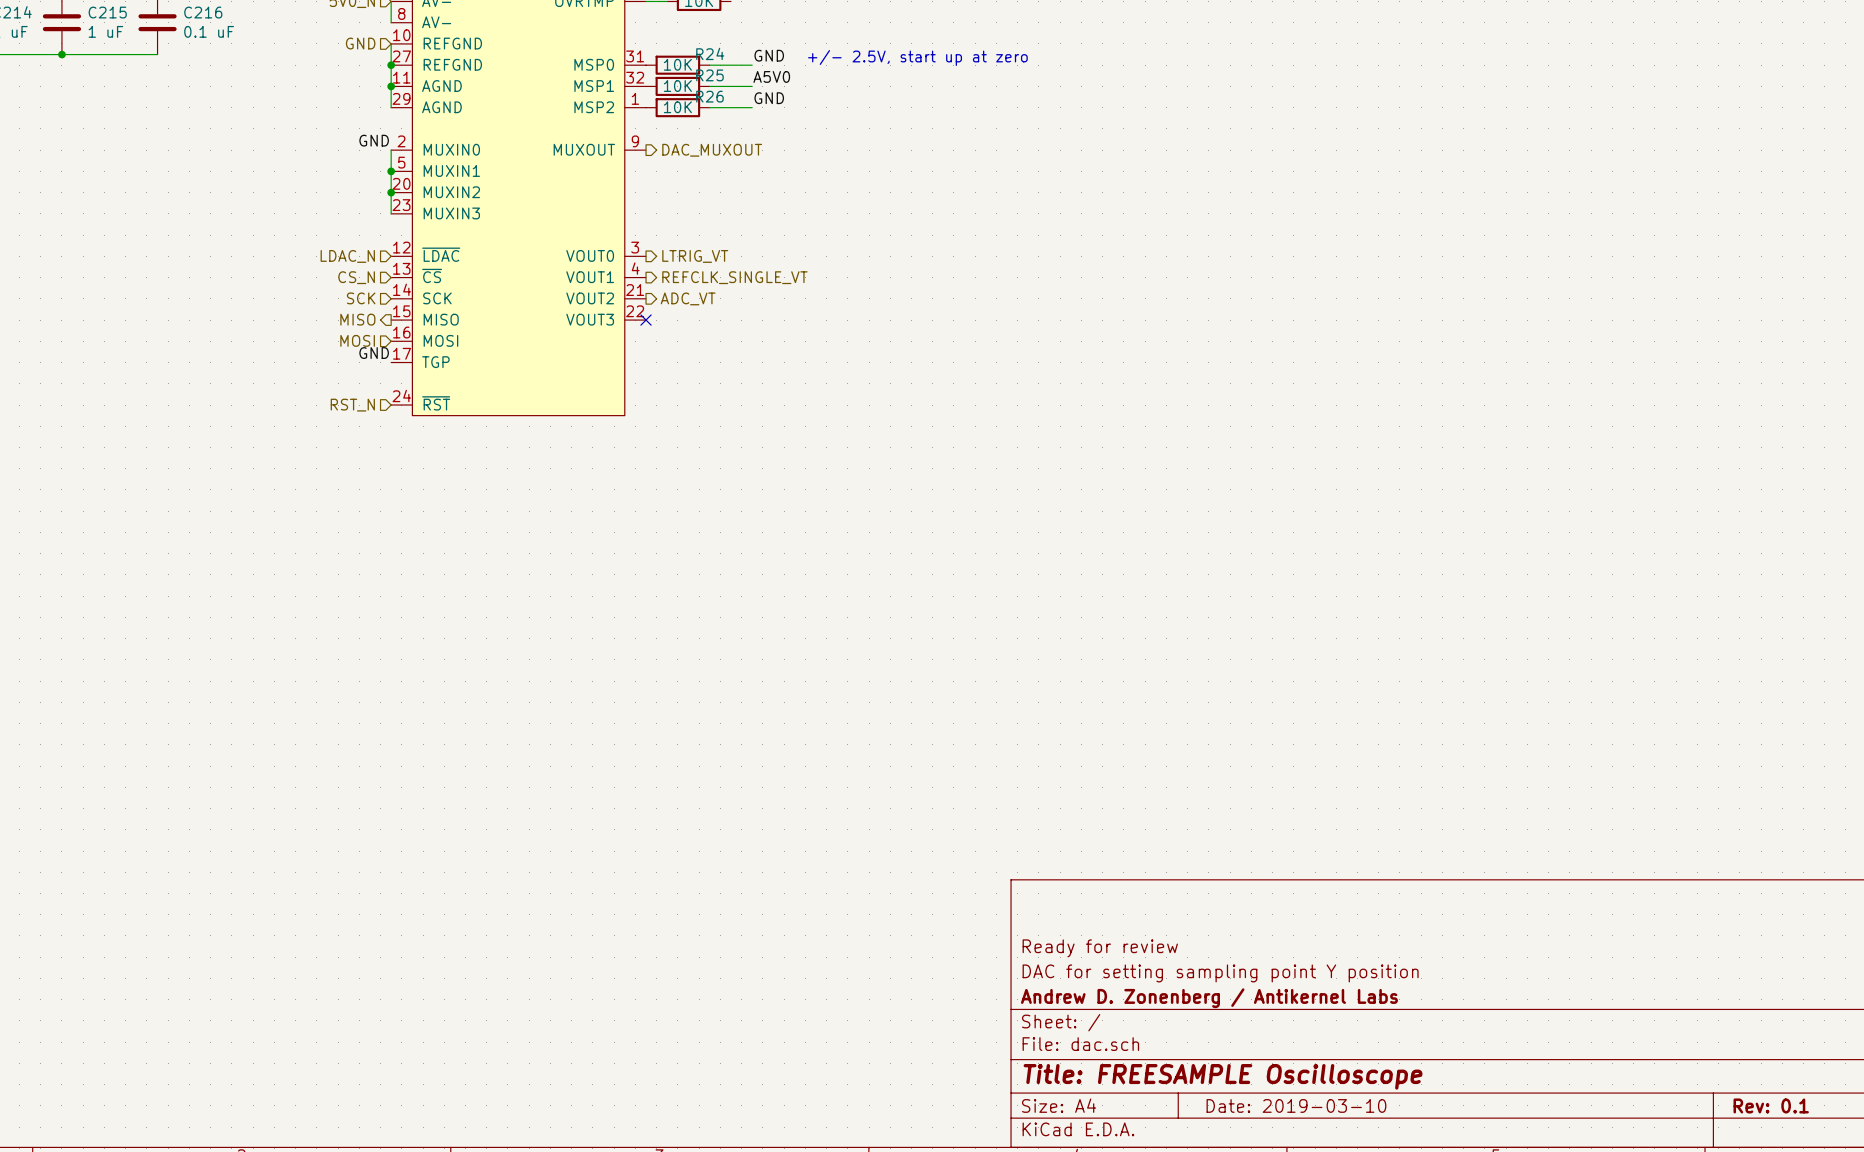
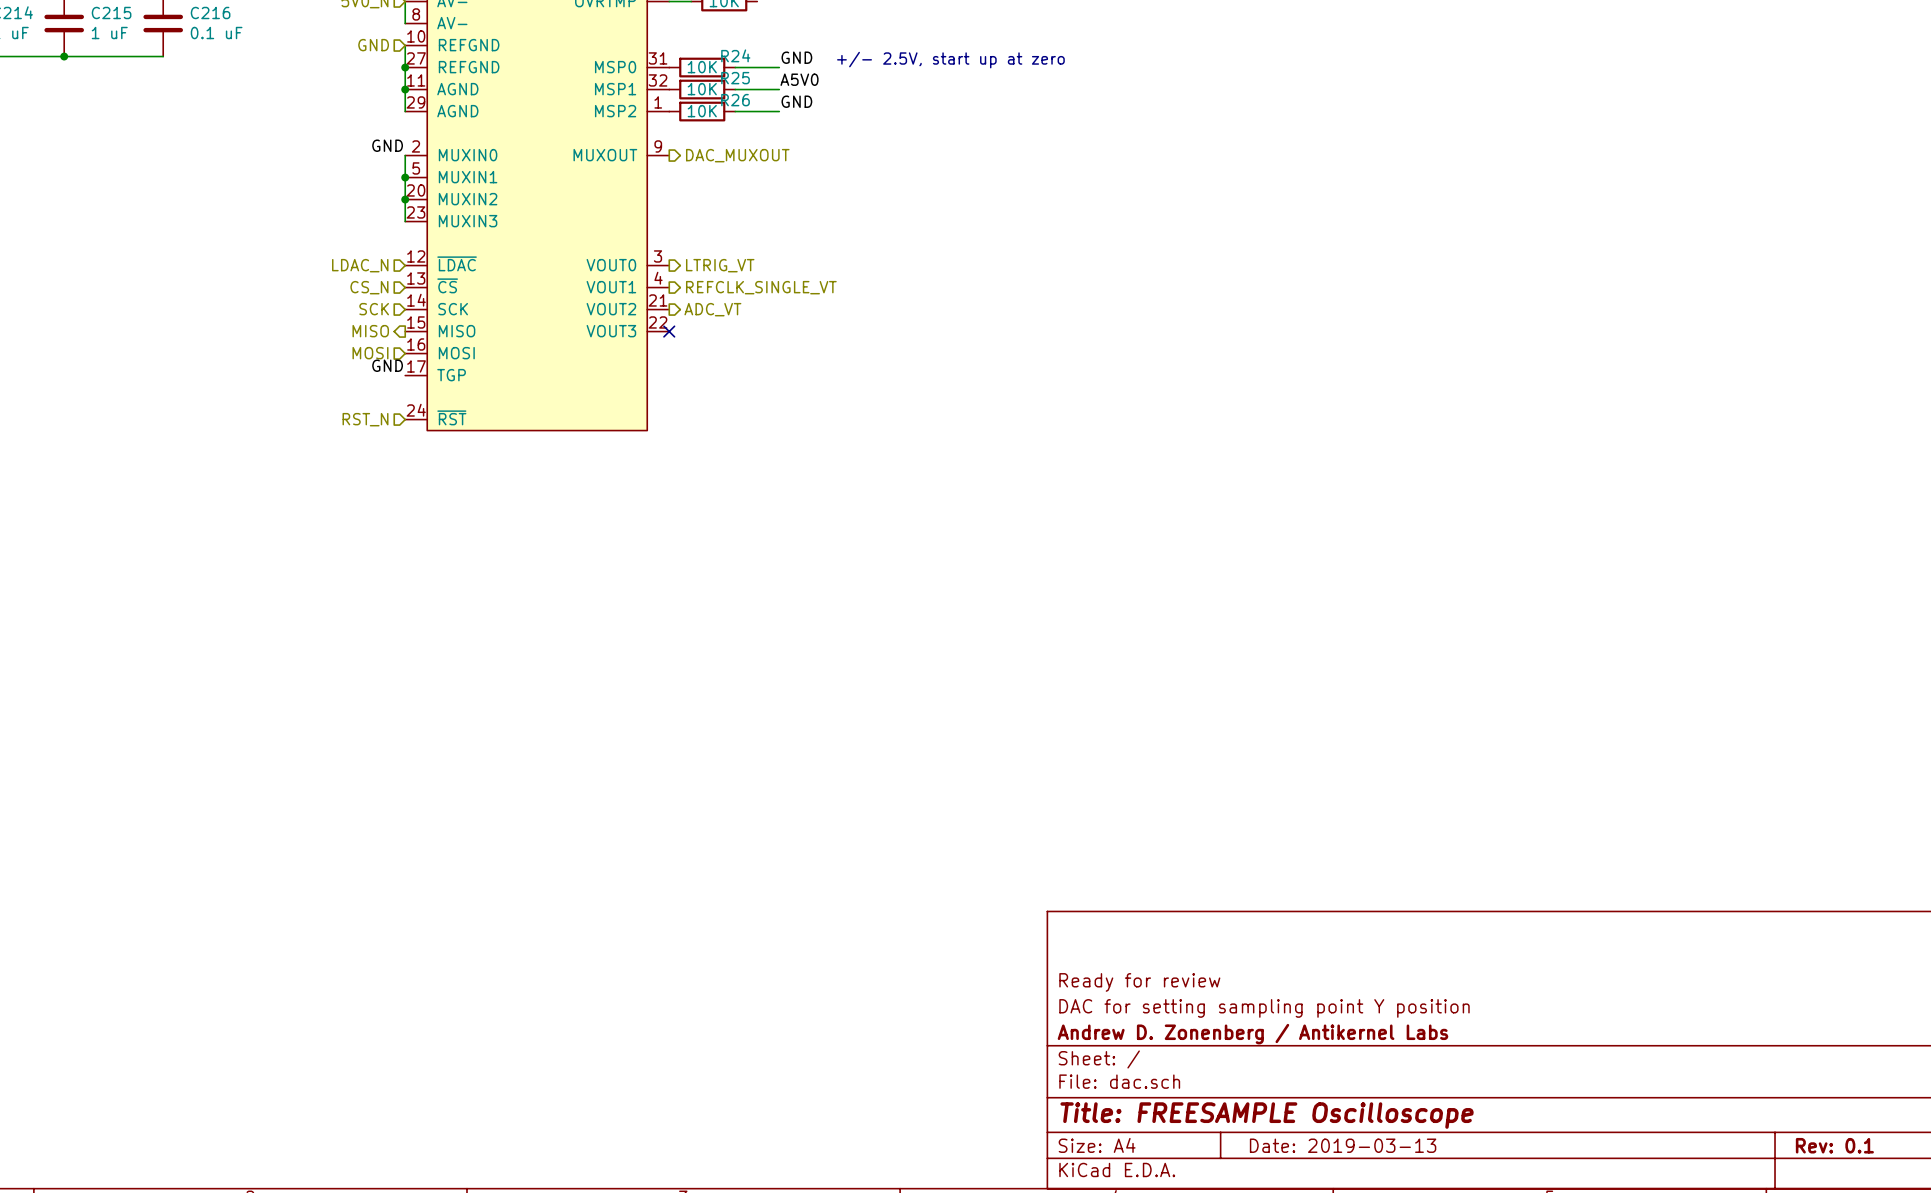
title block: Date: 2019-03-10 (1296, 1105) -> Date: 2019-03-13 (1343, 1145)

